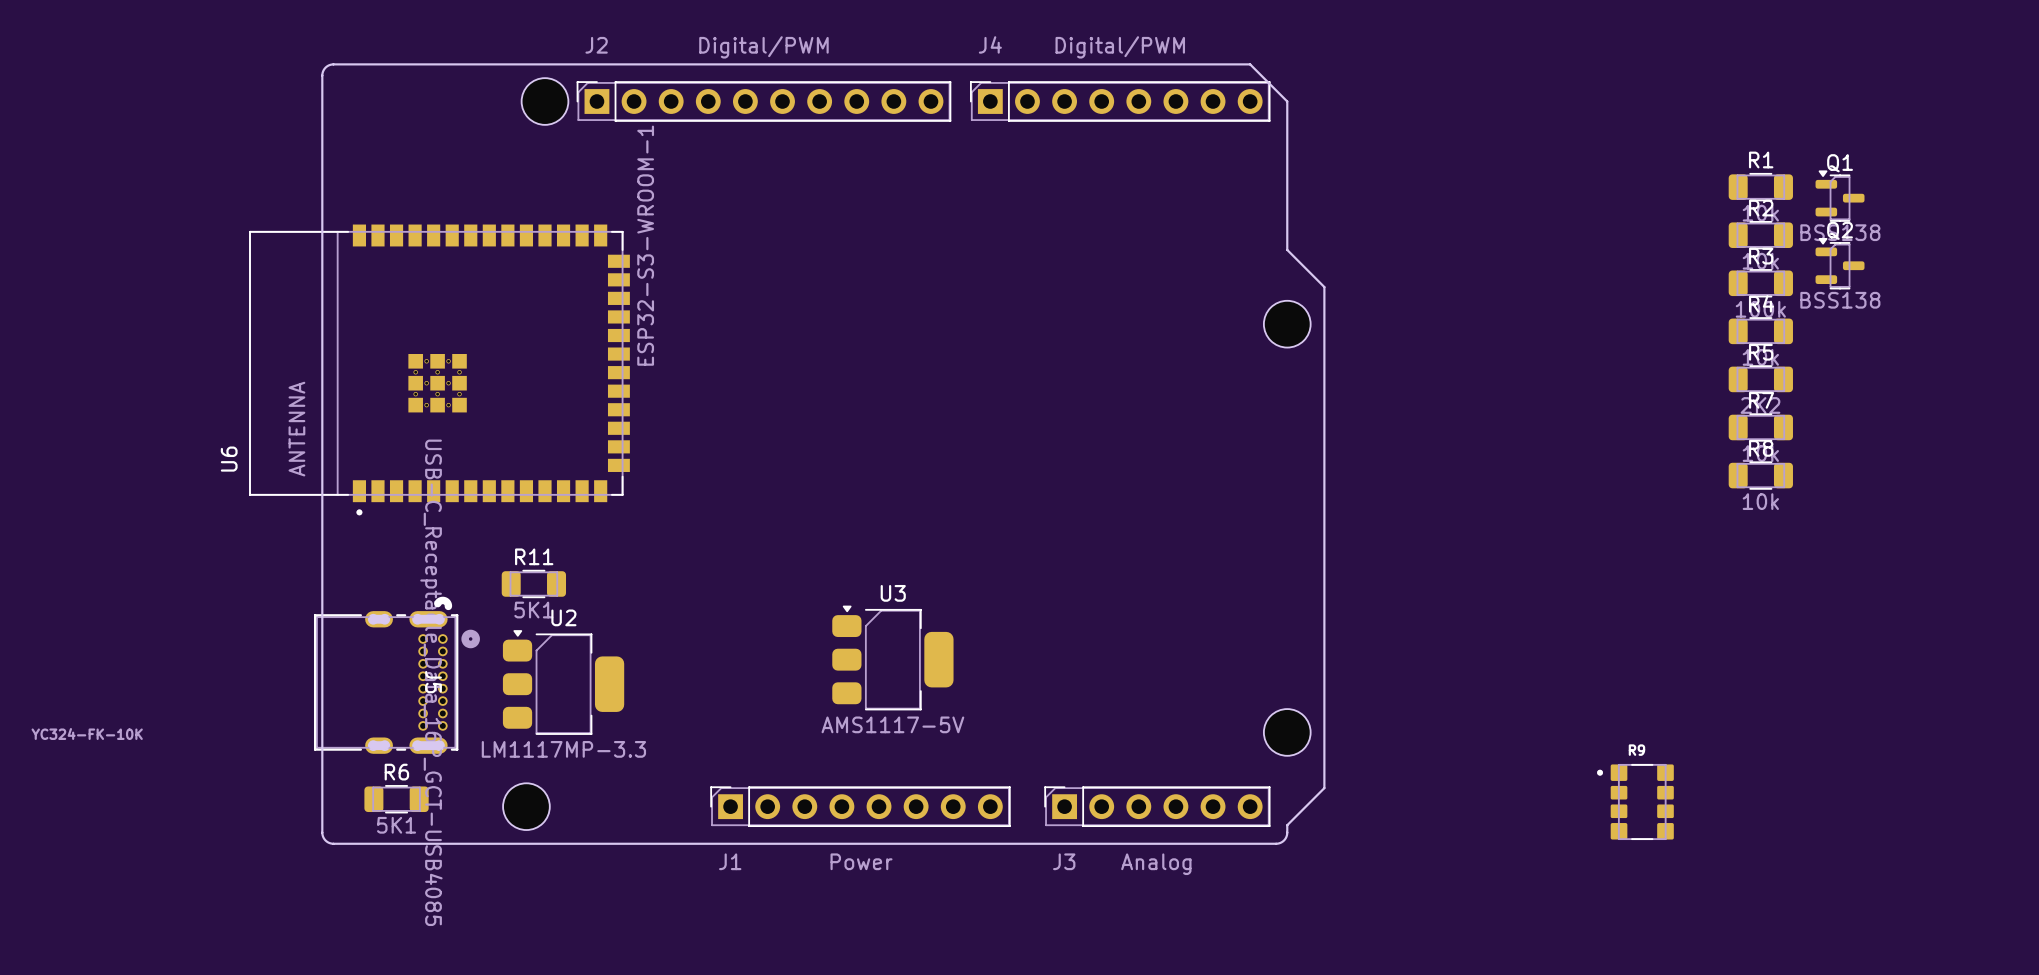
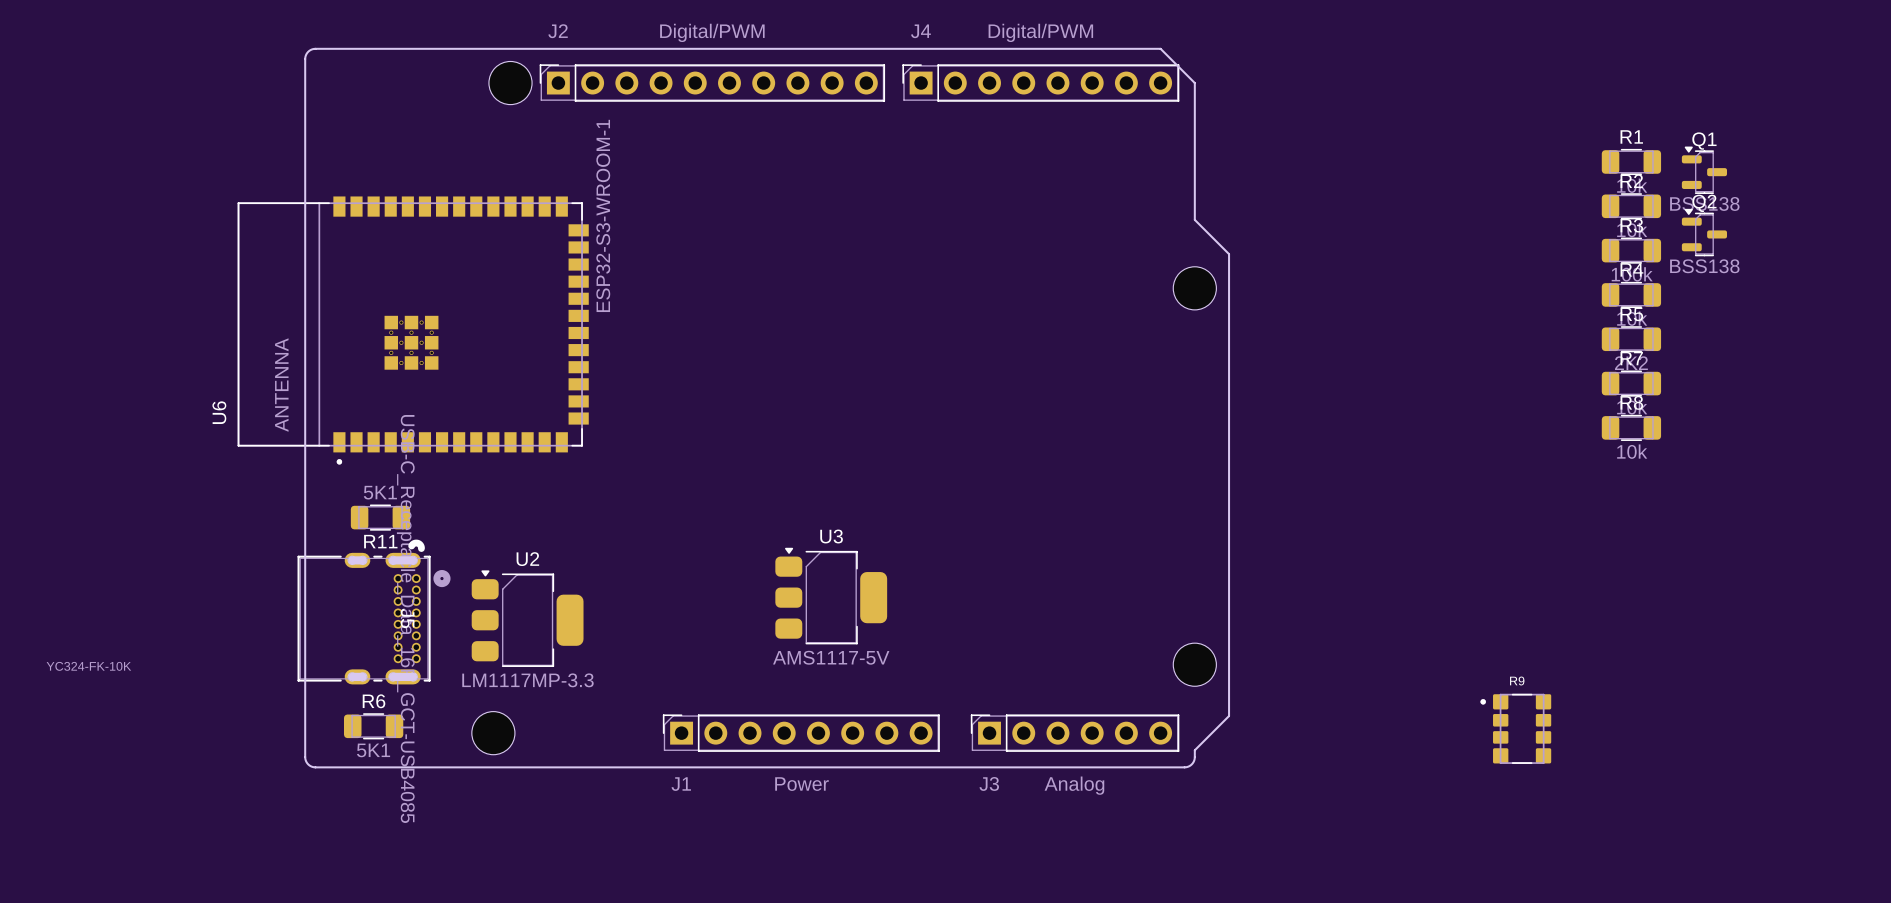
R11 name position: R11 (534, 556) -> R11 (380, 541)
R11 position: (533, 583) -> (380, 517)
R11 value position: 5K1 (533, 610) -> 5K1 (380, 492)

